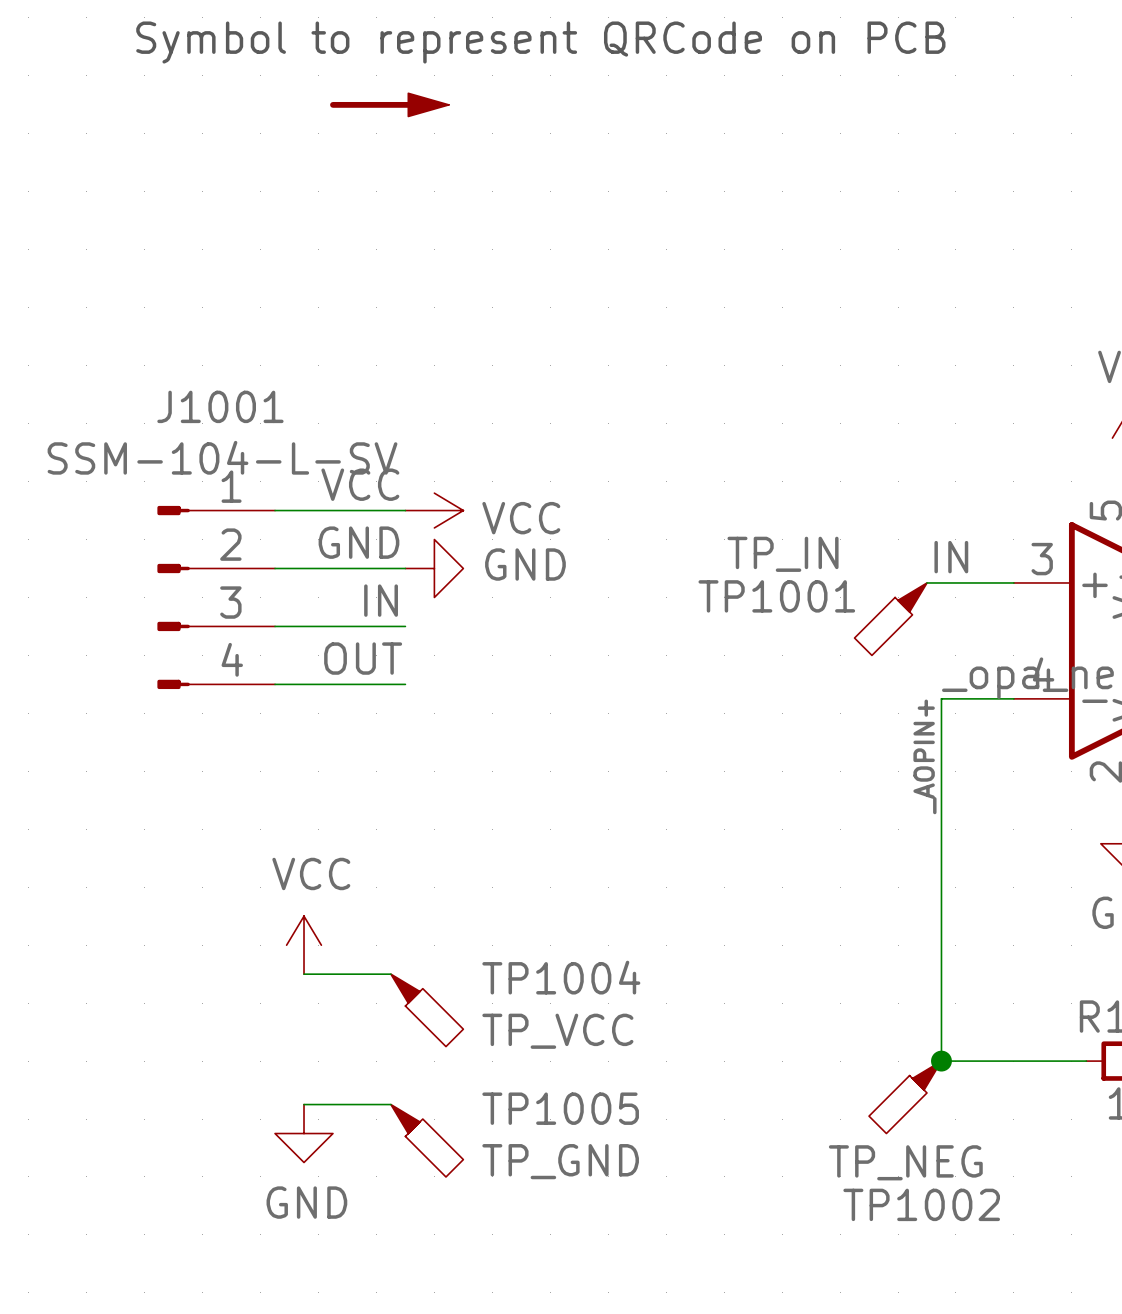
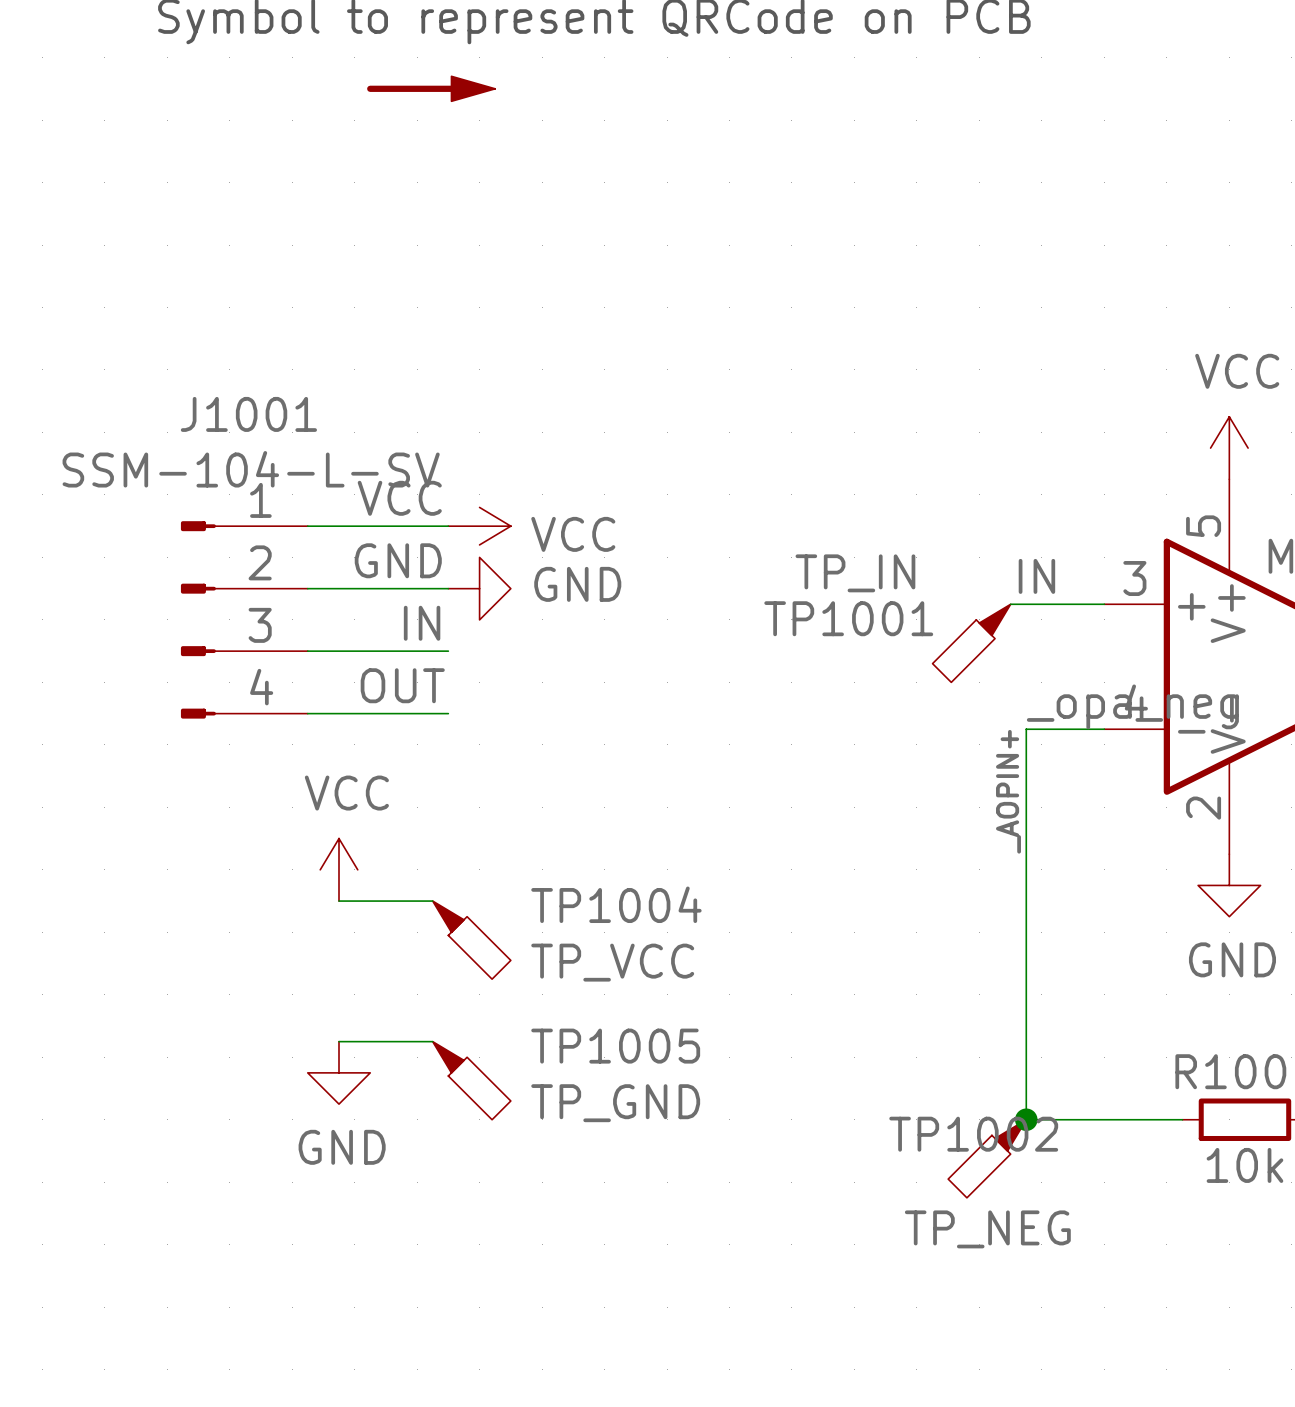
power symbol position: VCC (304, 945) -> VCC (339, 869)
wire: (304, 974) (390, 974) -> (339, 901) (432, 901)
TP1004 position: (427, 1010) -> (471, 940)
wire: (304, 1104) (390, 1104) -> (339, 1041) (432, 1041)
power symbol position: GND (304, 1133) -> GND (339, 1072)
TP1005 position: (427, 1140) -> (471, 1080)
TP1002 name position: TP1002 (921, 1204) -> TP1002 (973, 1134)

